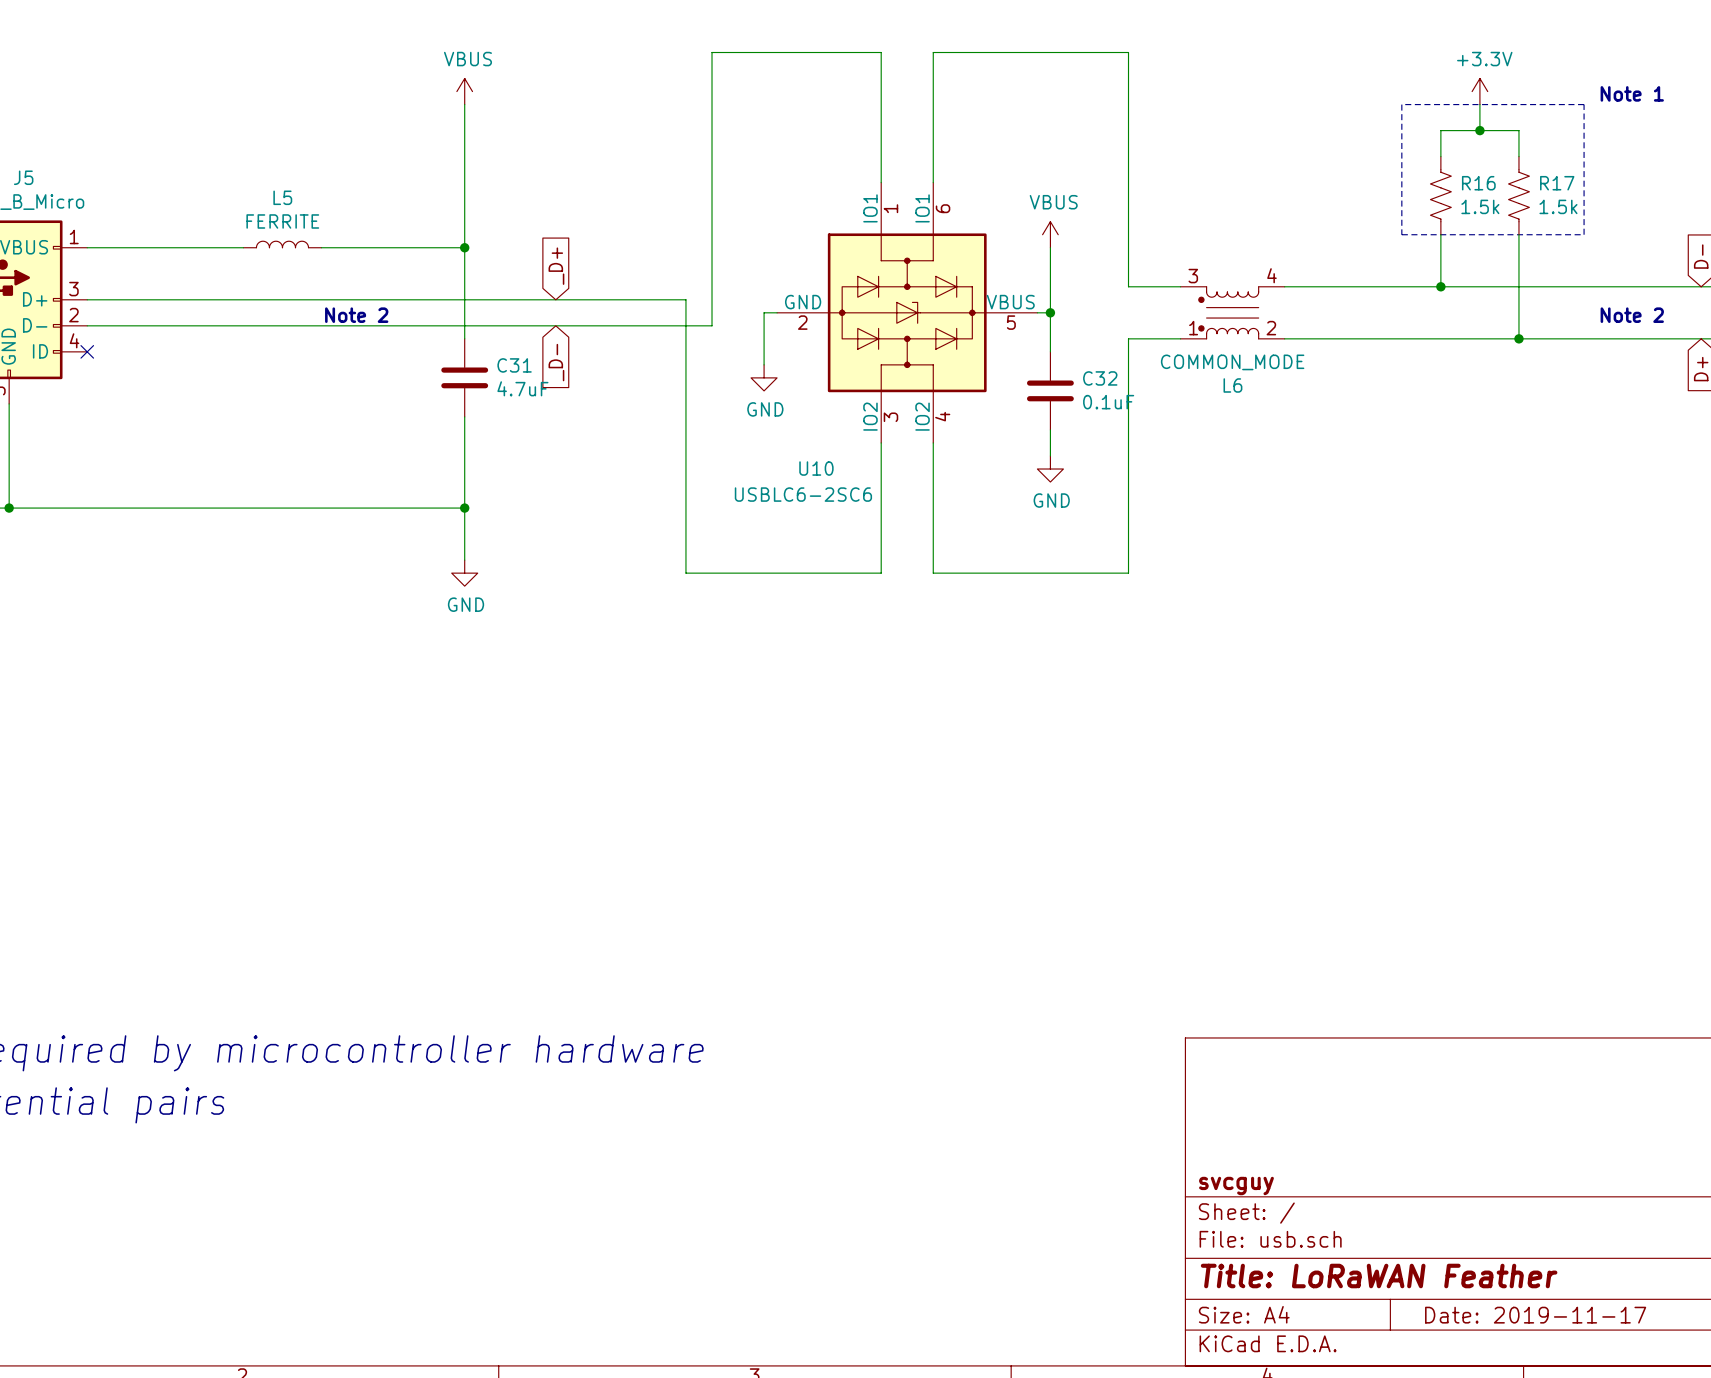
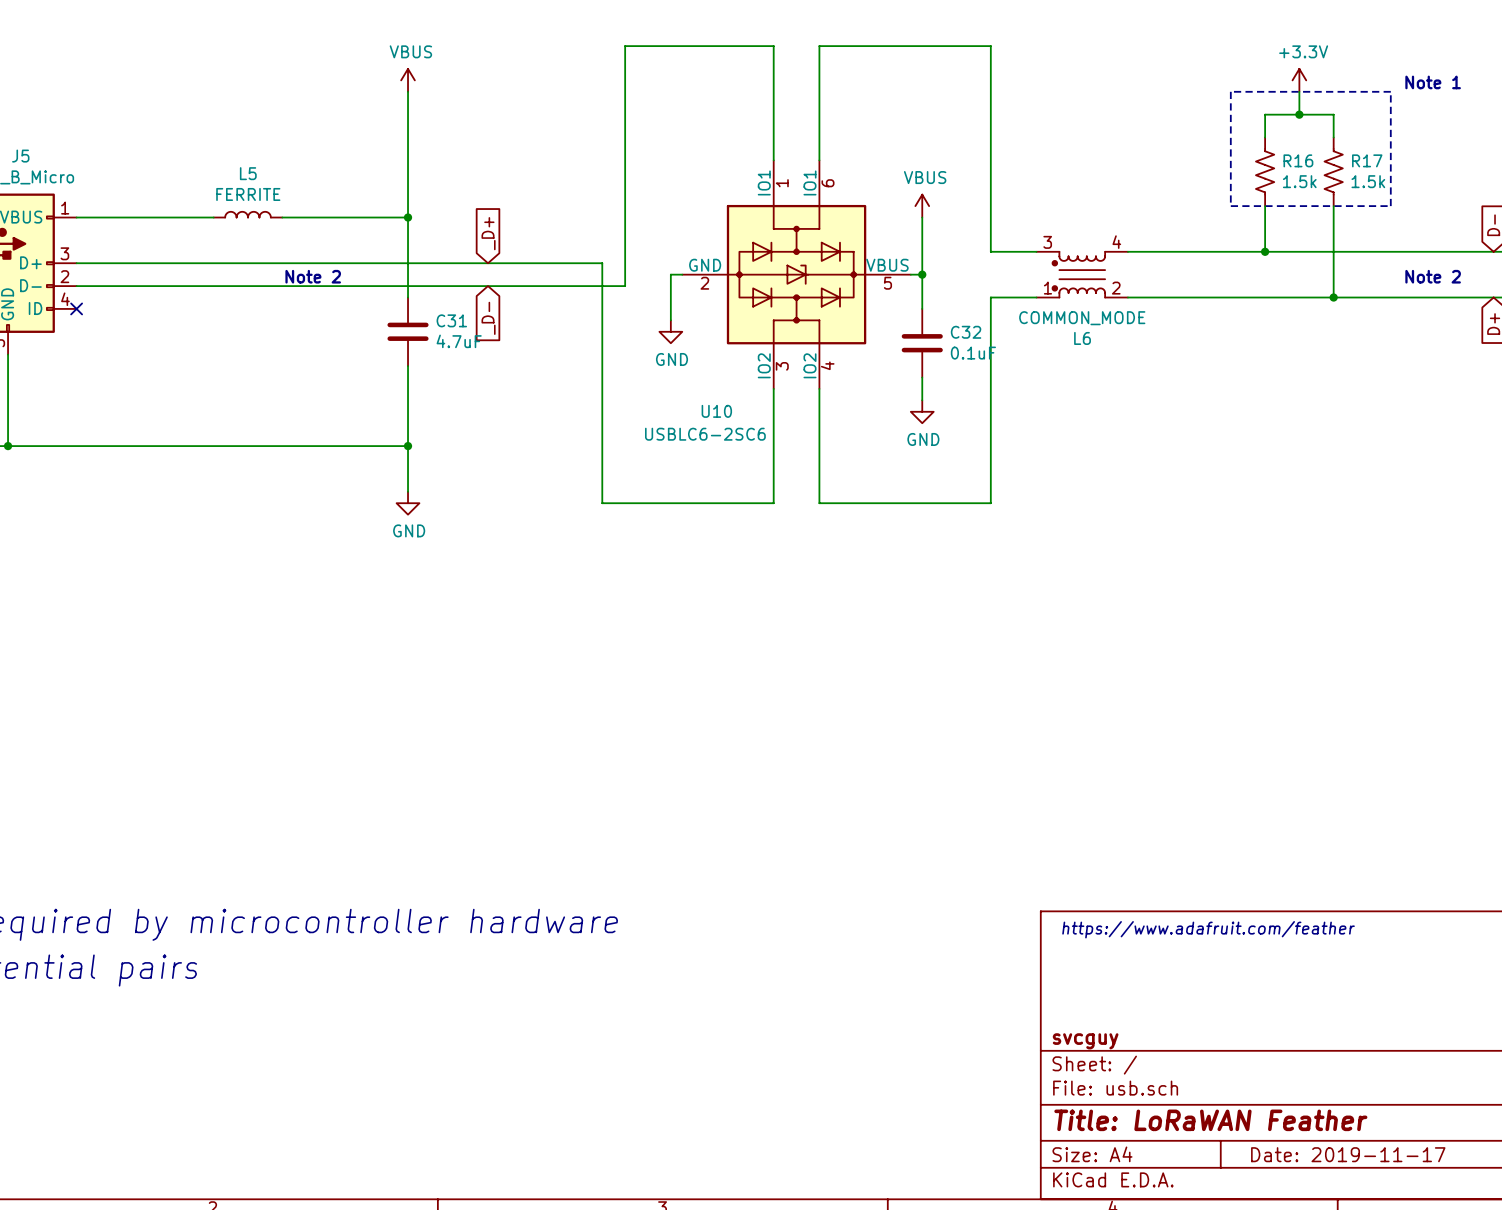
text: none -> https://www.adafruit.com/feather (1208, 929)

